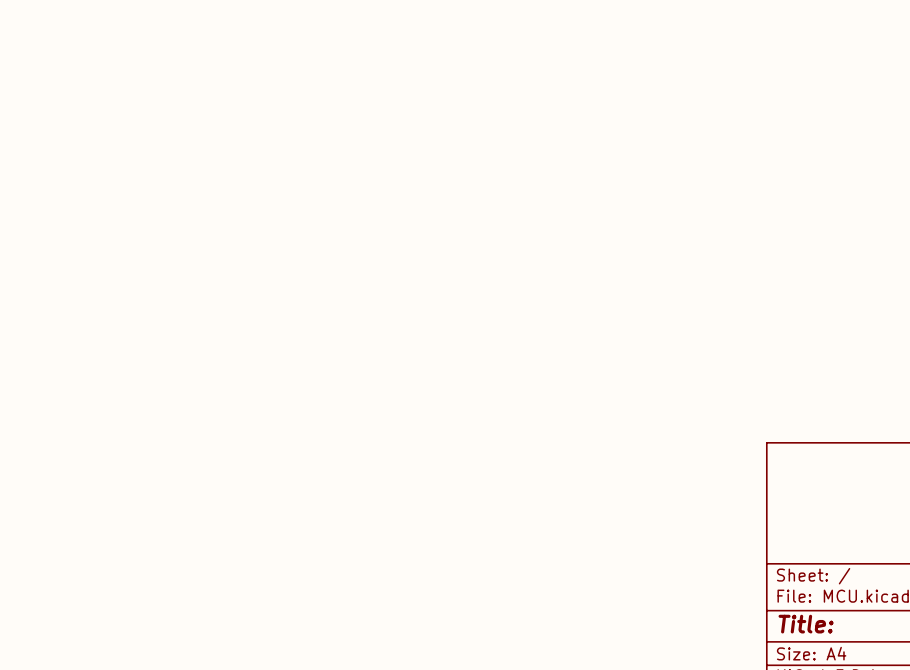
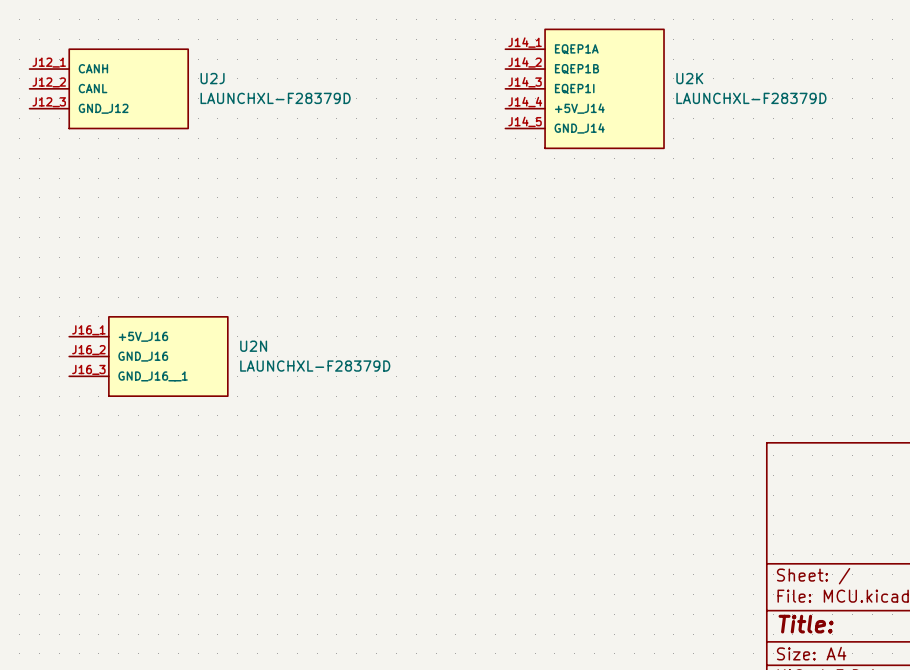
U2J: none -> LAUNCHXL-F28379D (109, 88)
U2K: none -> LAUNCHXL-F28379D (585, 88)
U2N: none -> LAUNCHXL-F28379D (148, 356)

